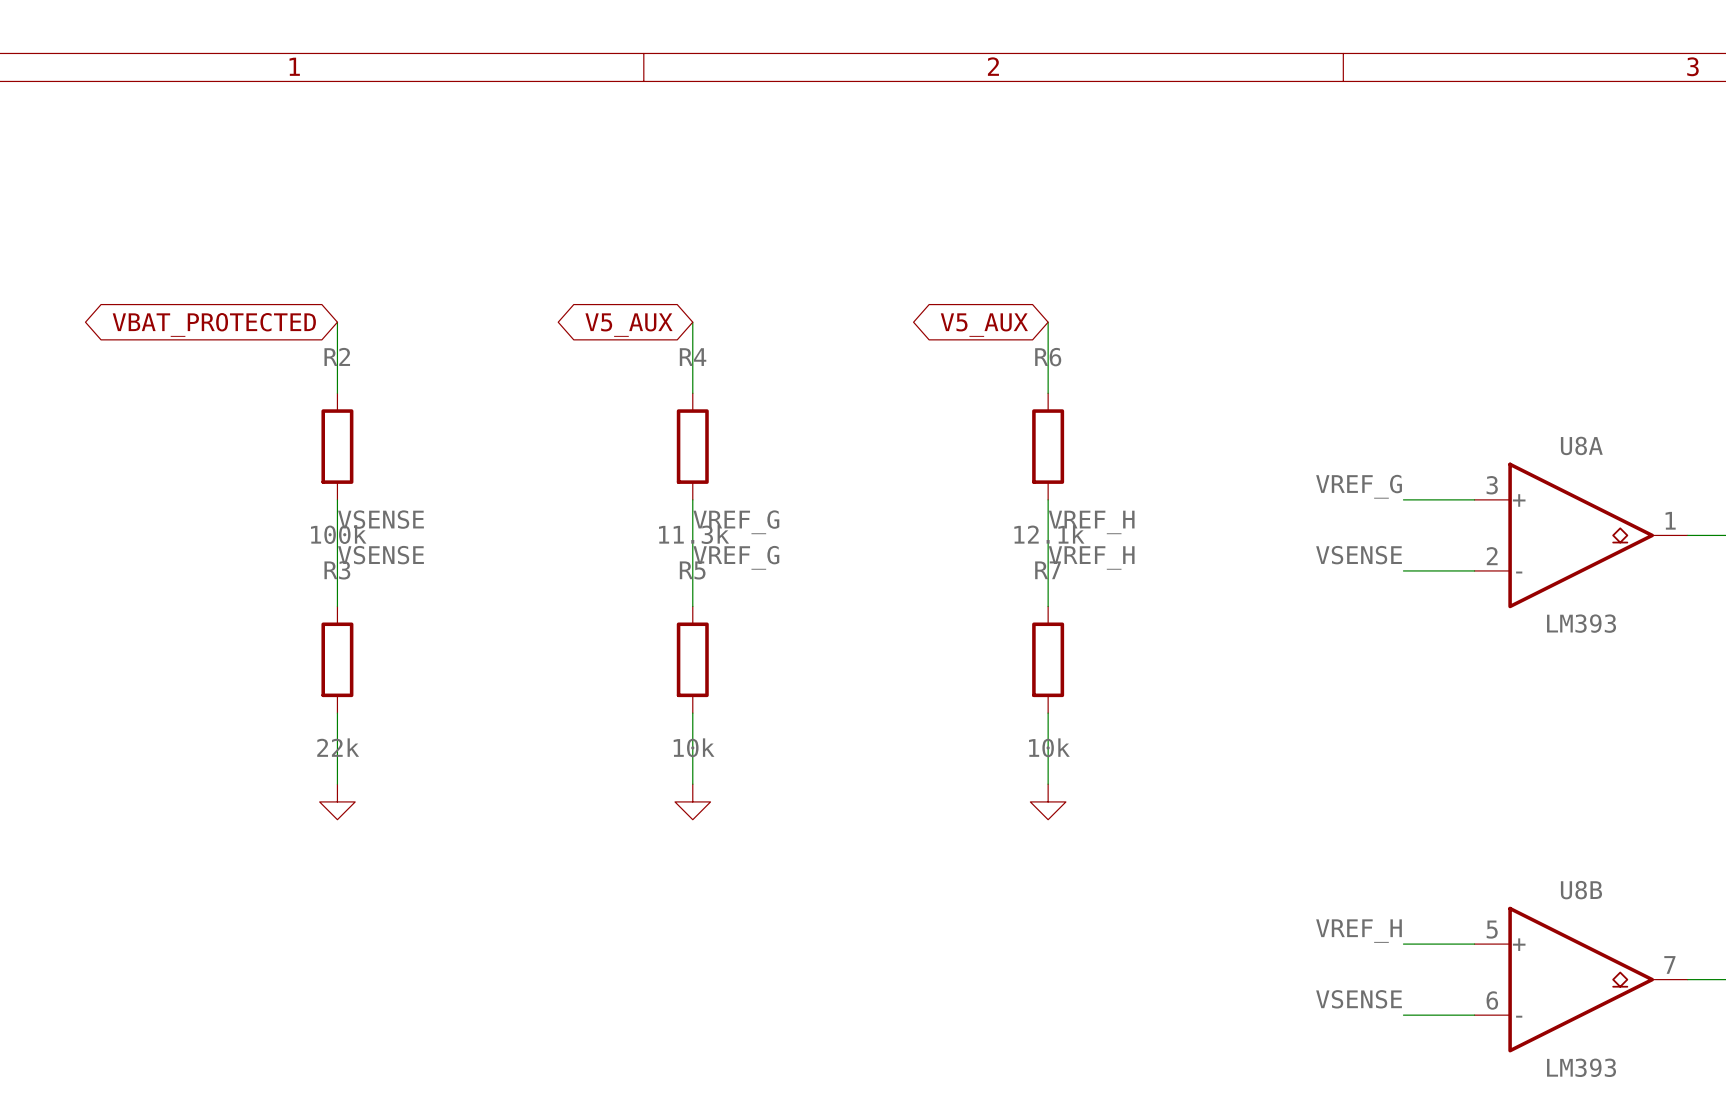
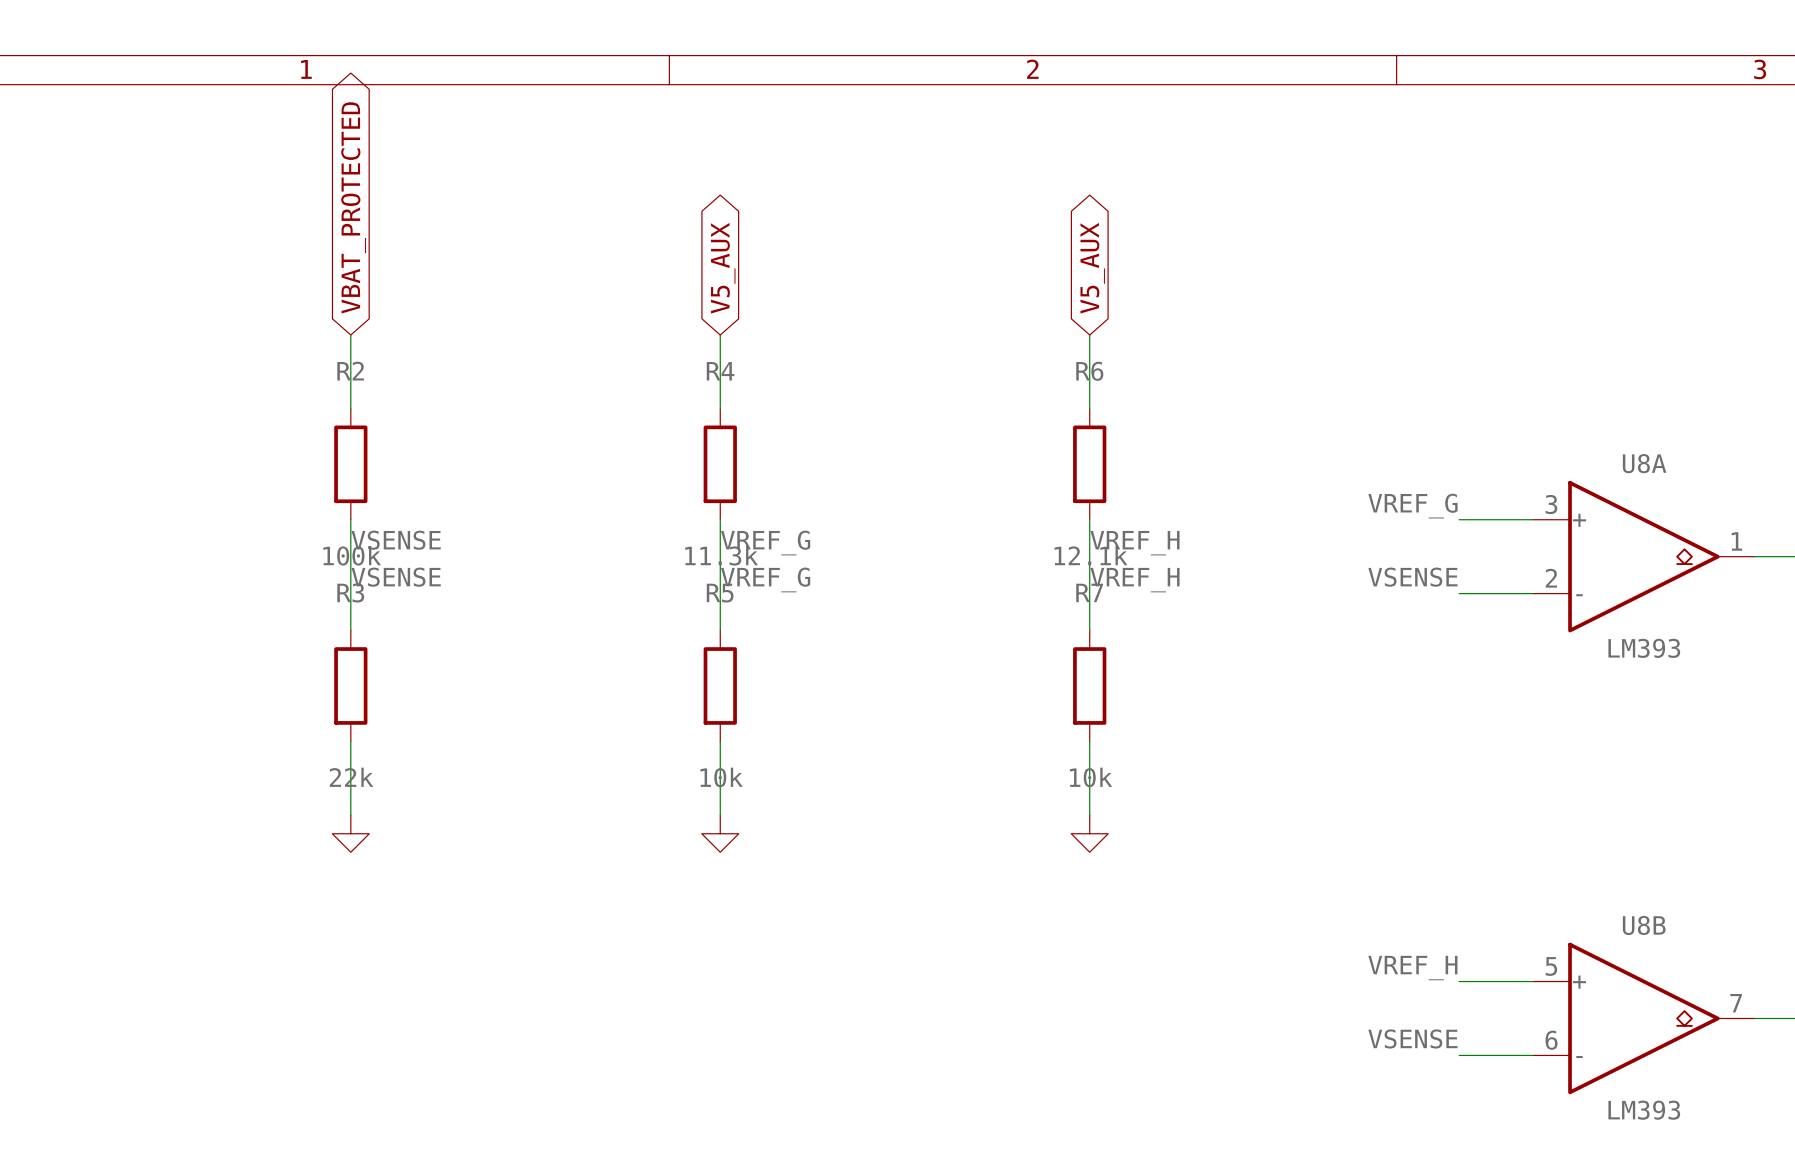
global label rotation: 0° (214, 324) -> 90° clockwise (353, 207)
global label rotation: 0° (629, 325) -> 90° clockwise (723, 268)
global label rotation: 0° (984, 325) -> 90° clockwise (1092, 268)

